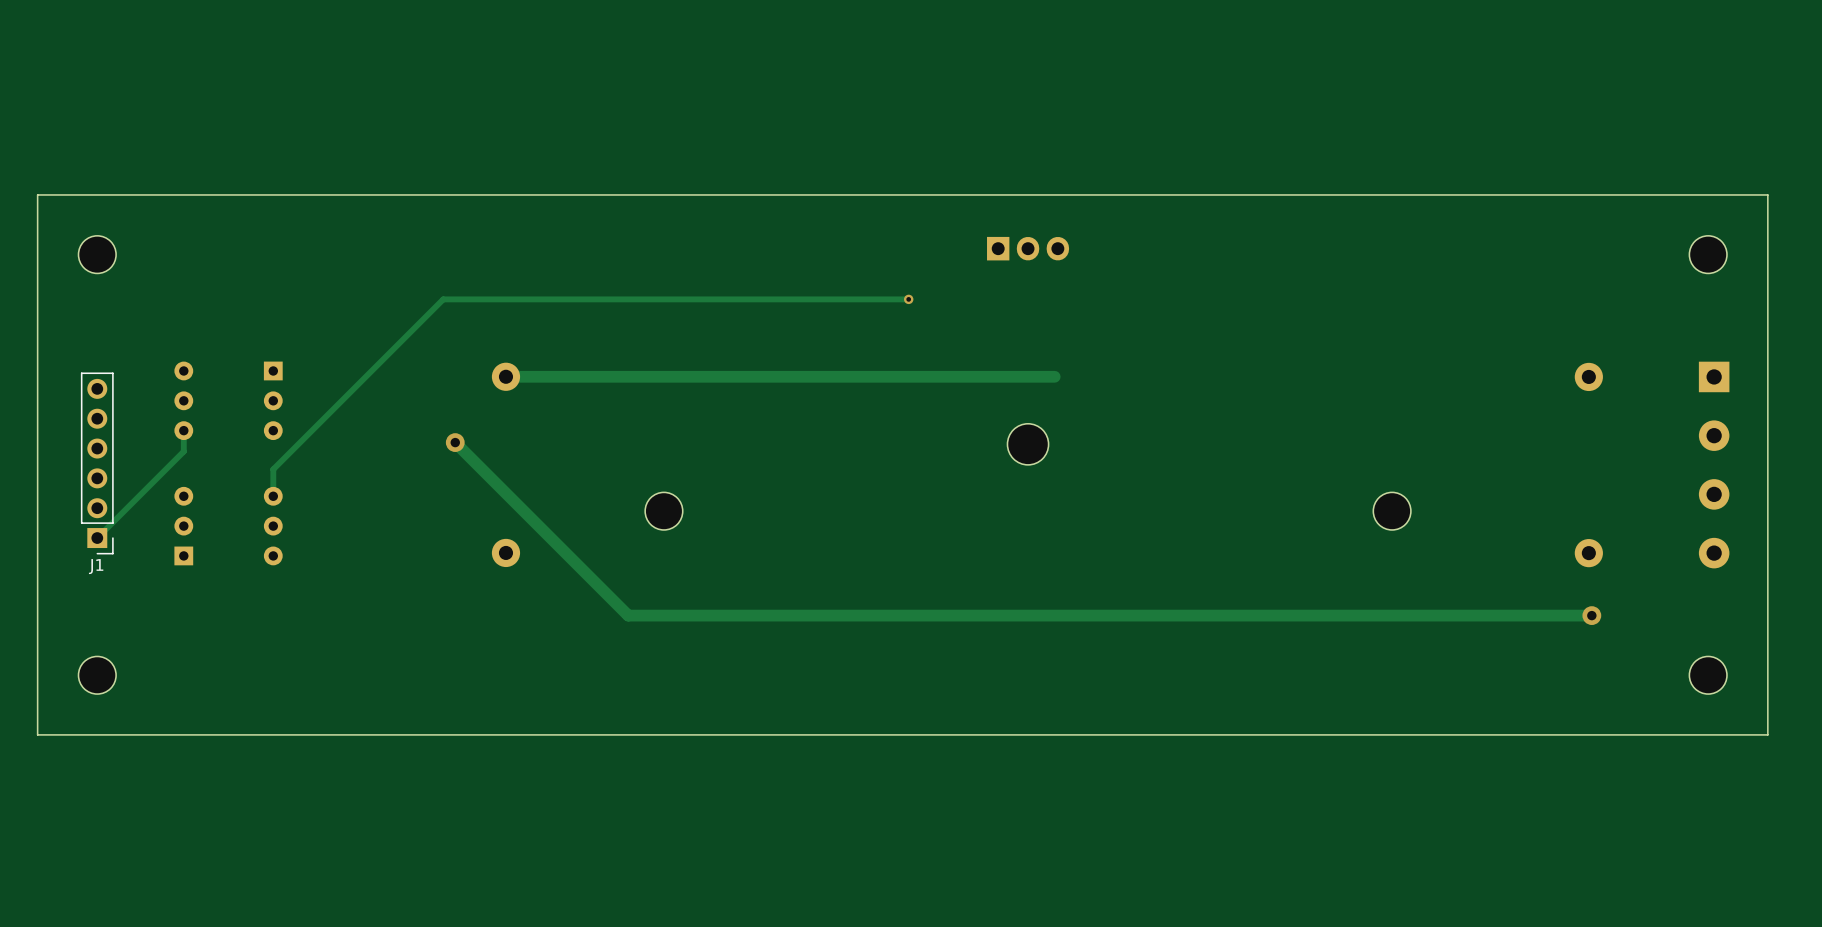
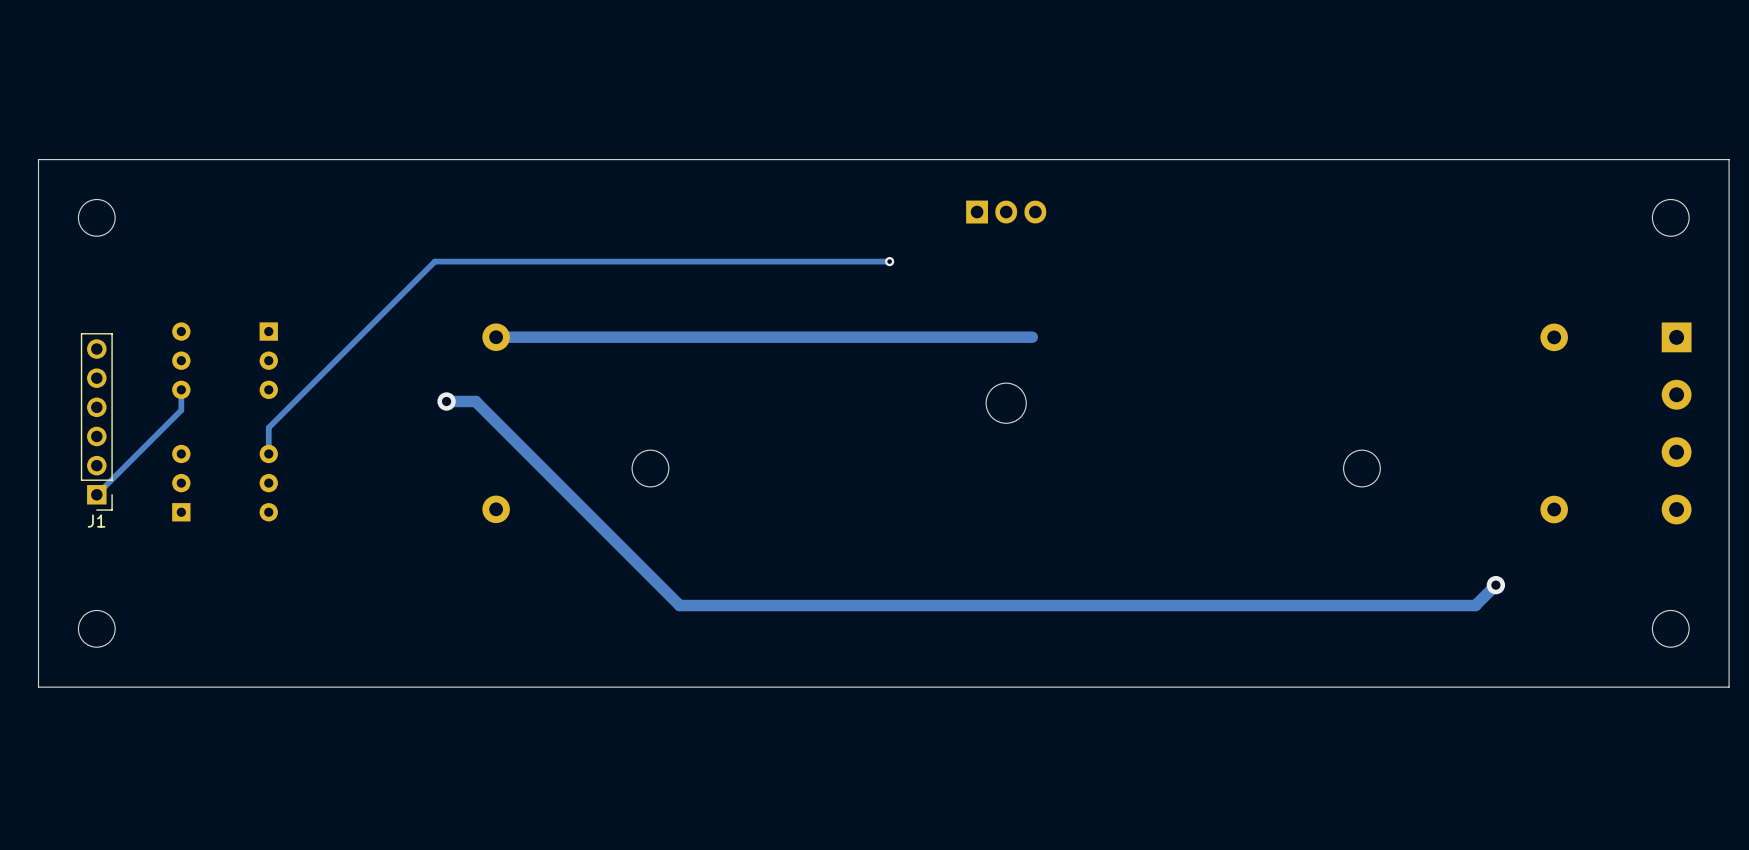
track: none -> (443, 401) (475, 401) (679, 605) (1475, 605) (1495, 585)
track: (455, 442) (628, 615) (1591, 615) -> none
via position: (1591, 615) -> (1495, 585)

